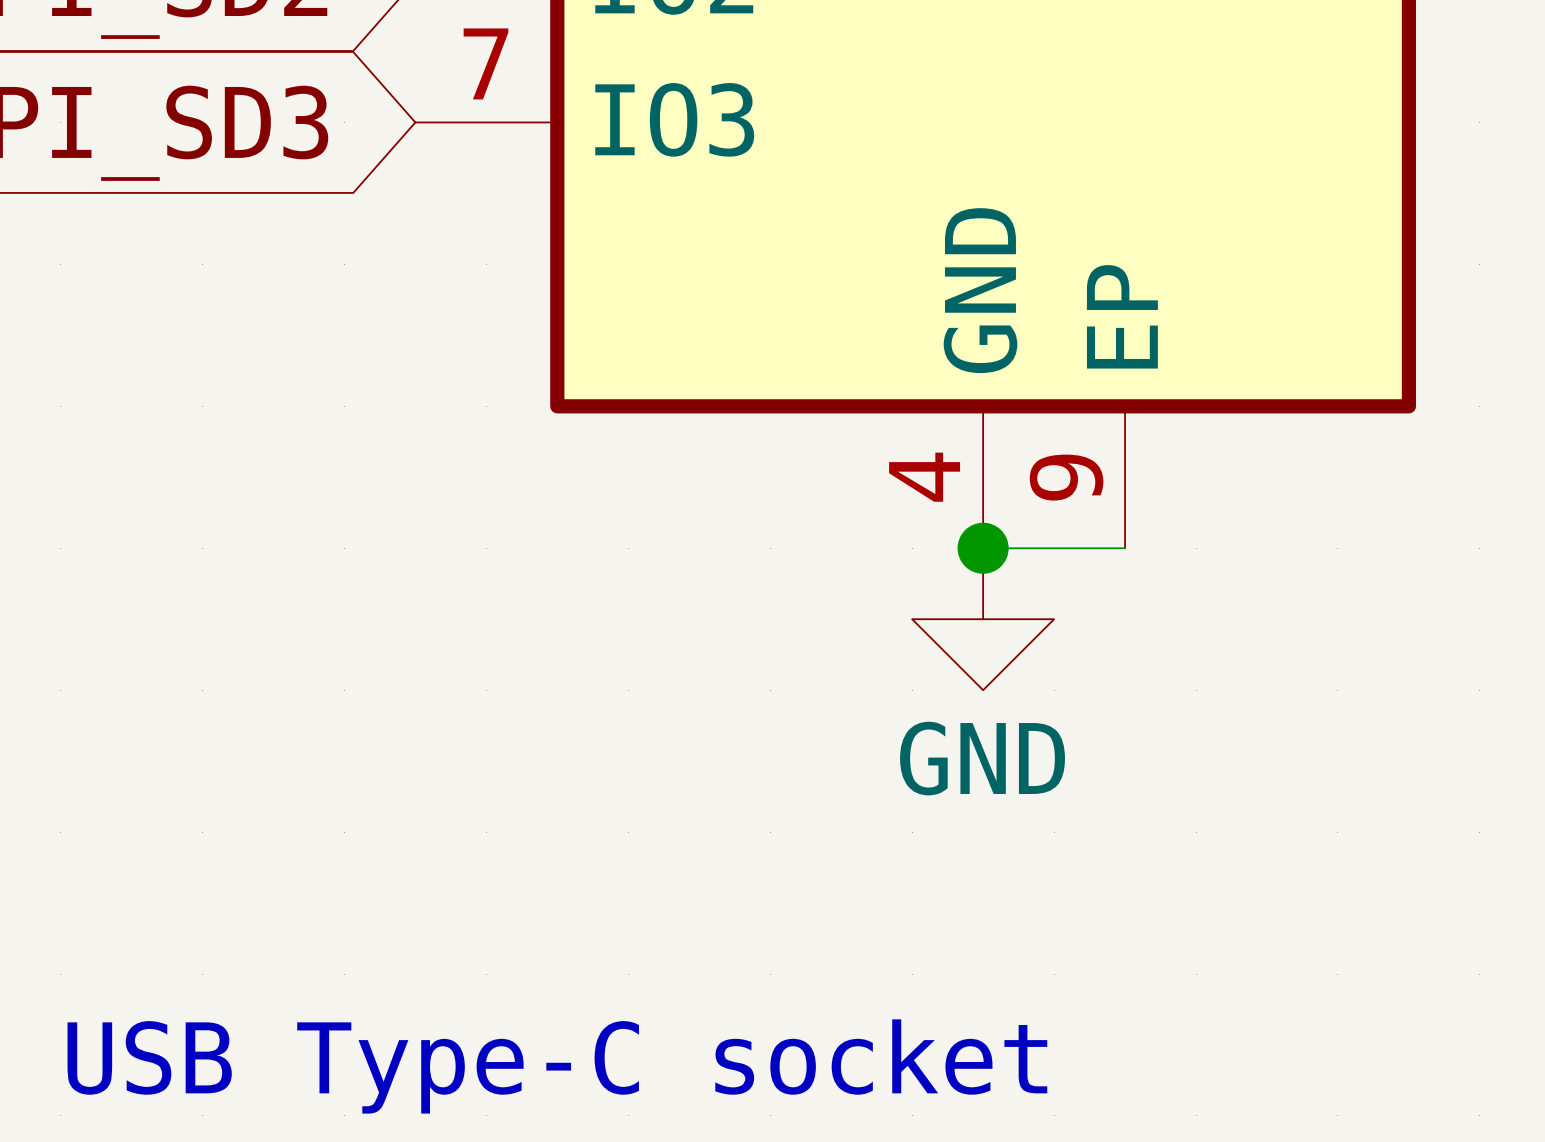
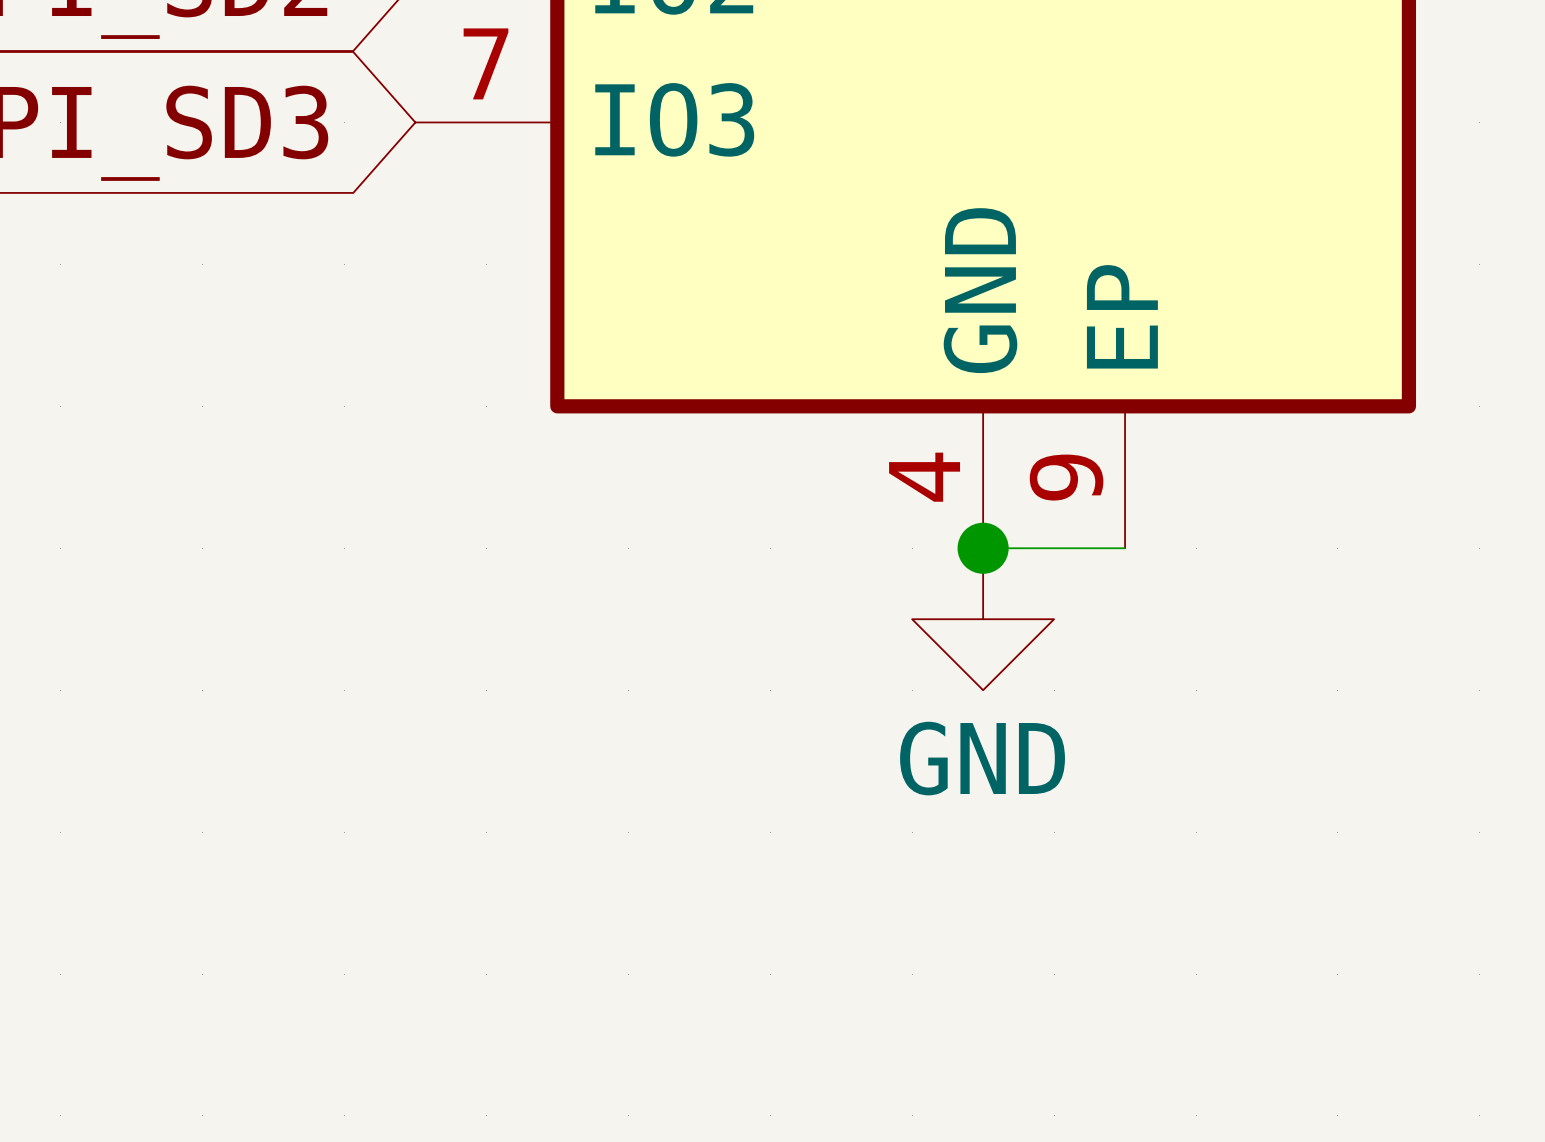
text: USB Type-C socket (557, 1066) -> none

